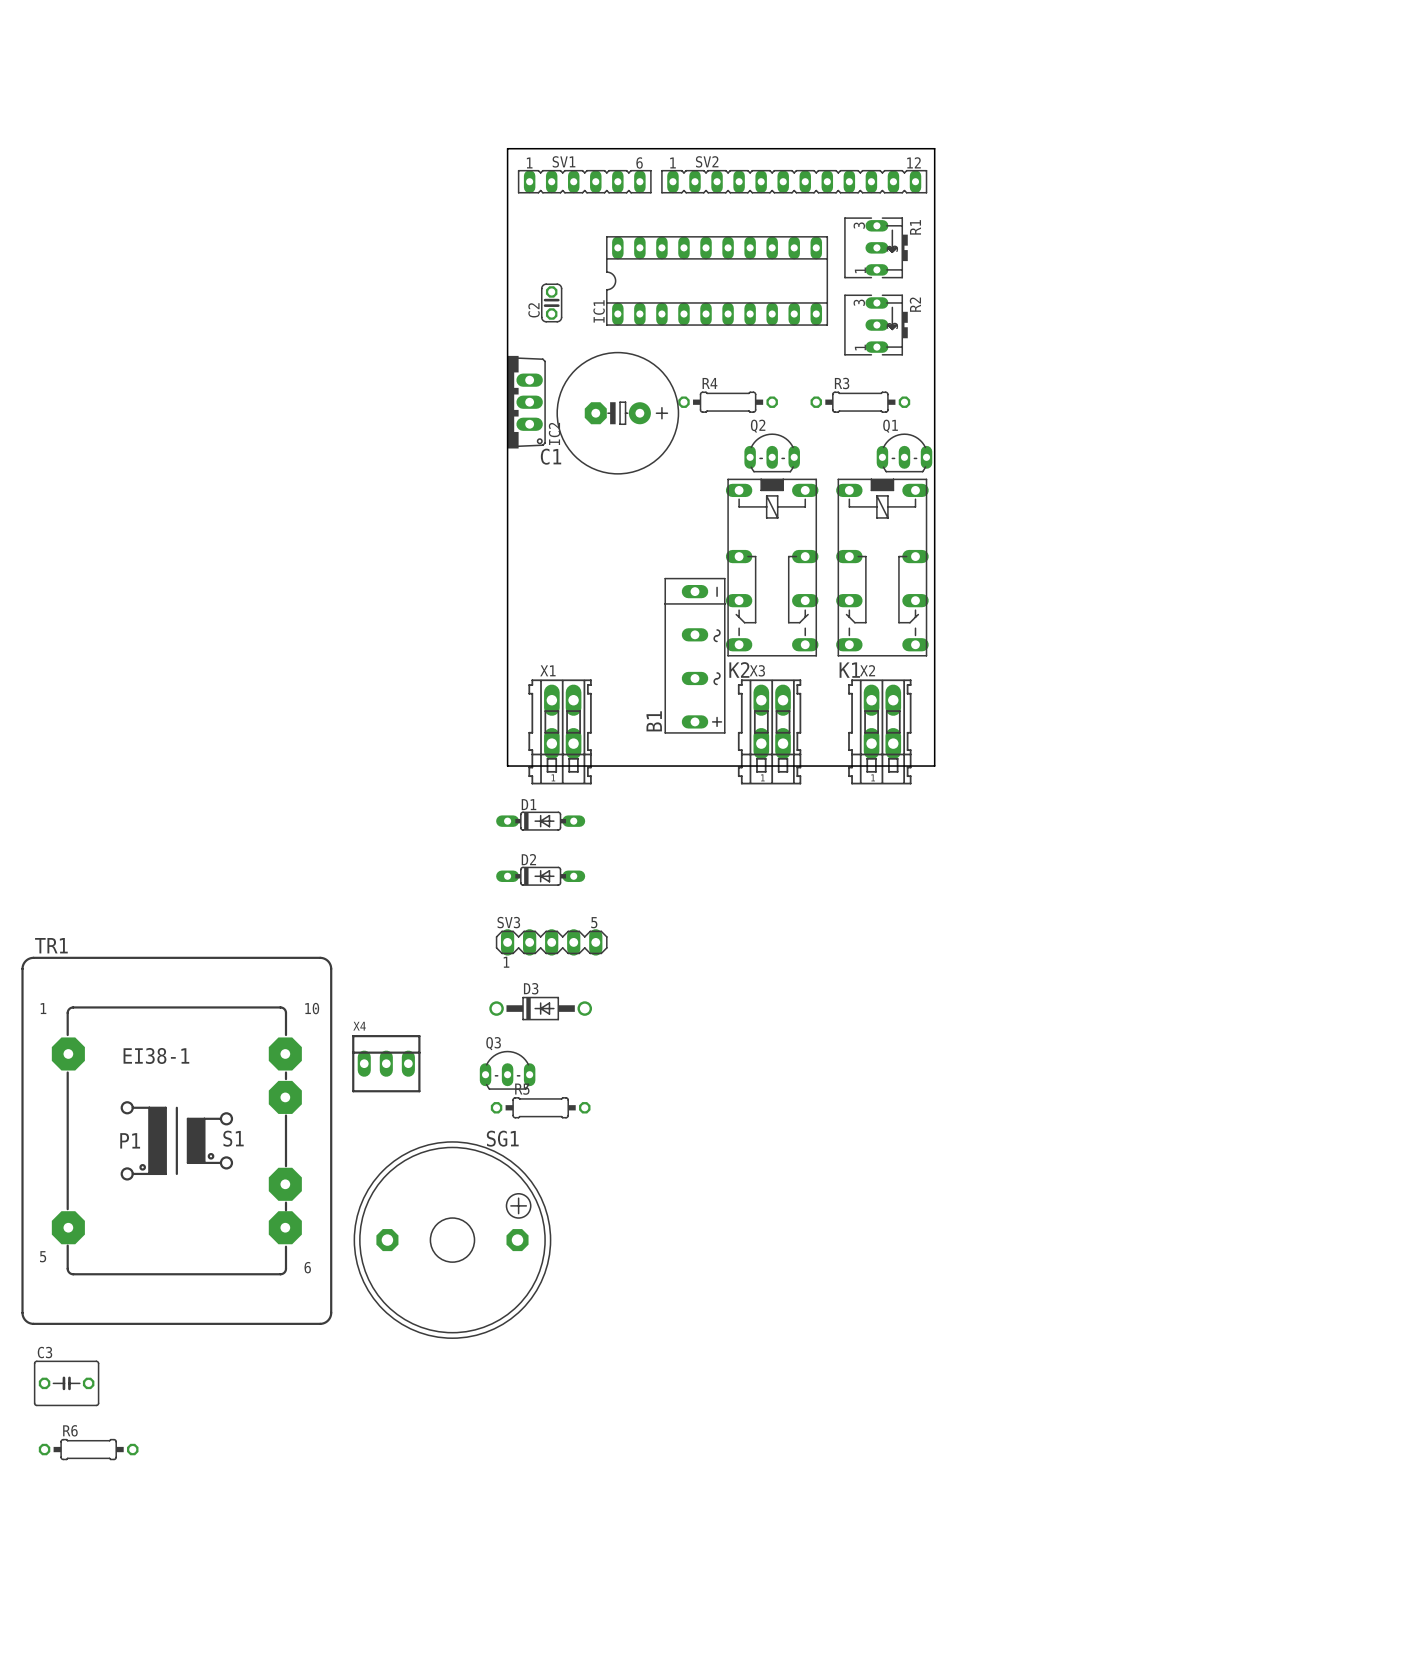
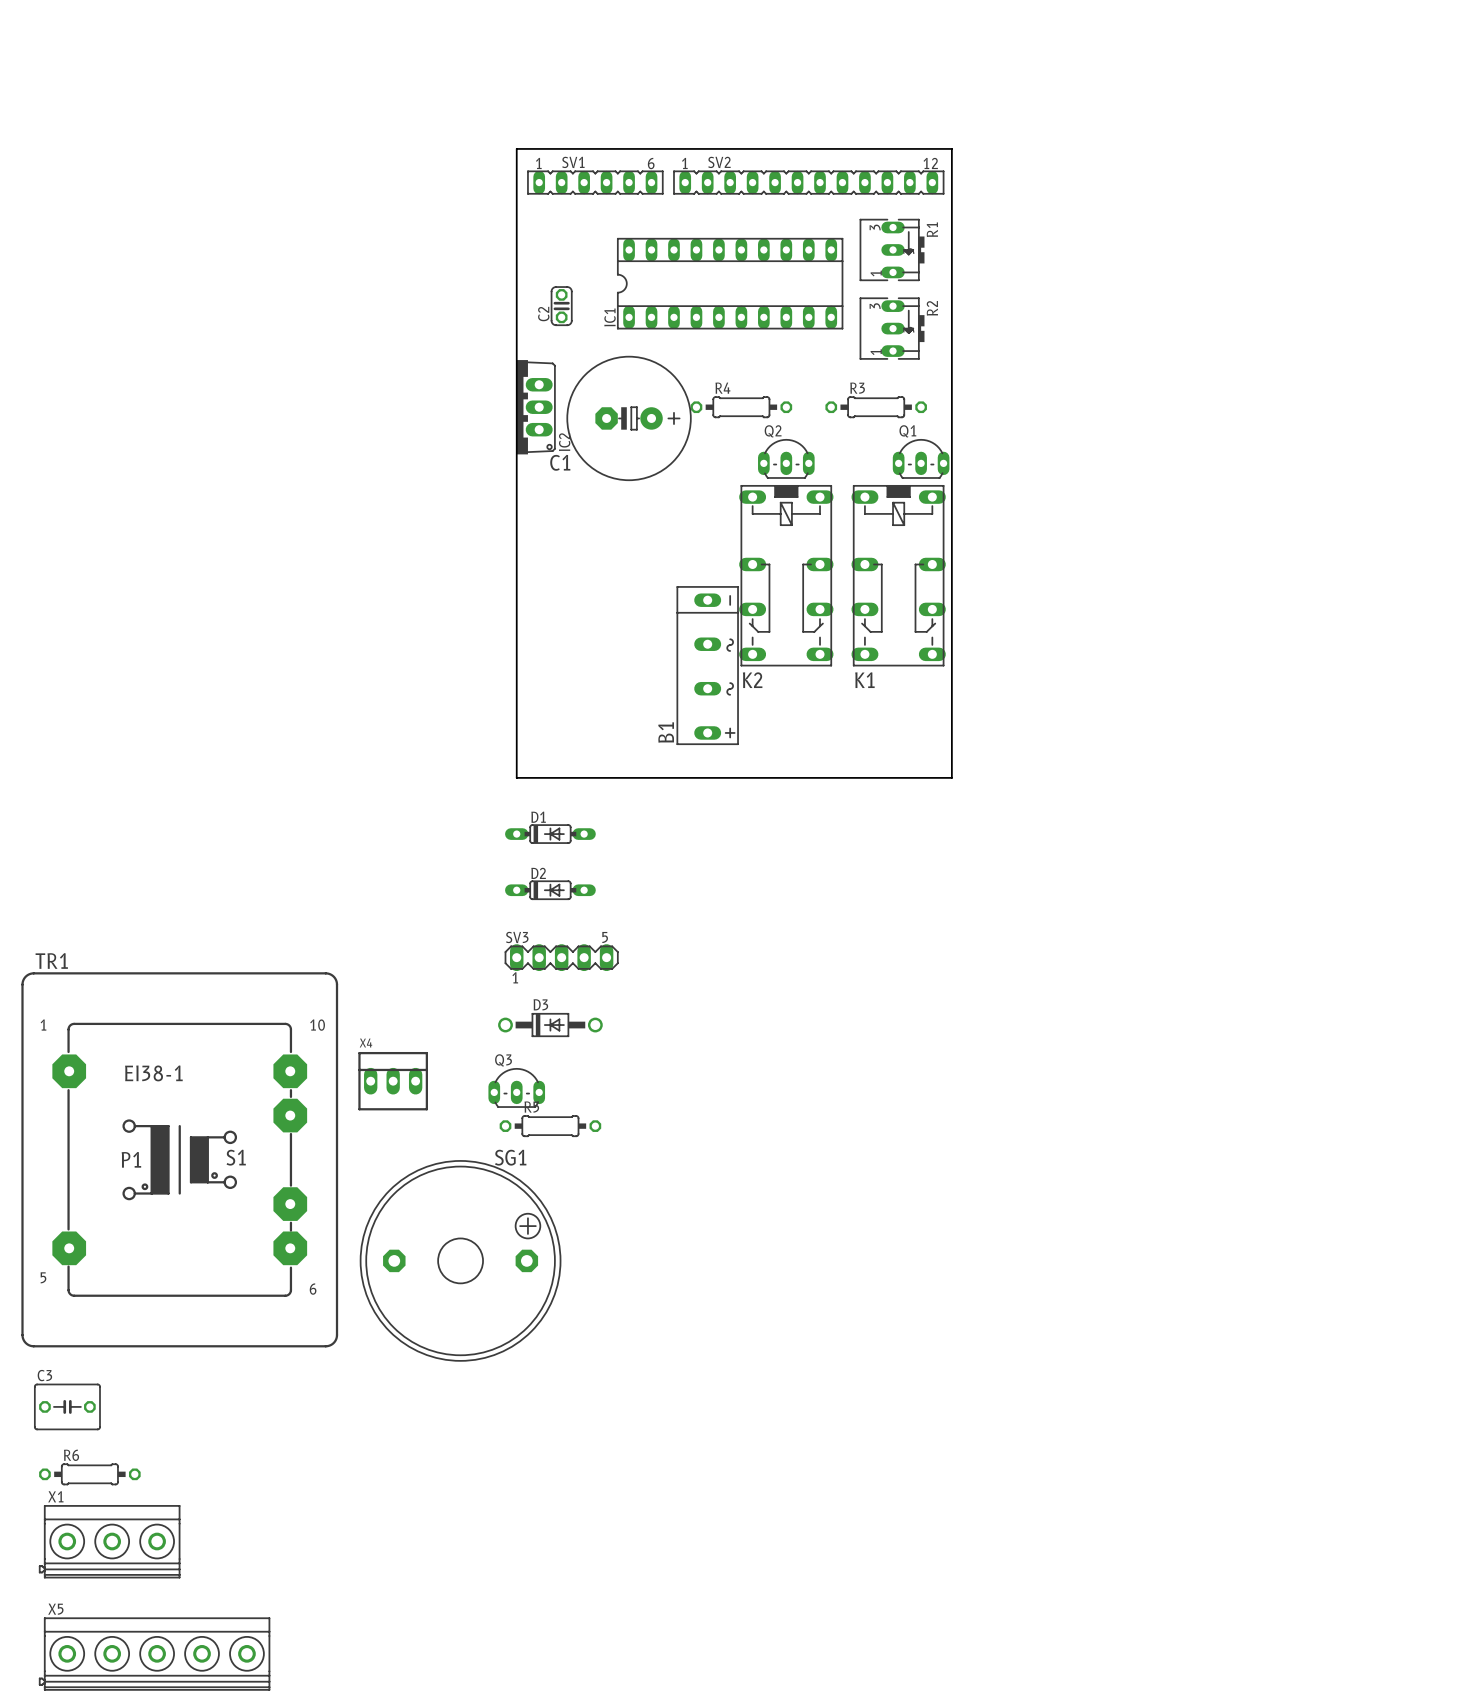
X1 name position: X1 (547, 670) -> X1 (55, 1496)
X1 footprint: [528, 679, 592, 785] -> [38, 1505, 181, 1579]
X3: (769, 731) -> none
X2: (879, 731) -> none
X5: none -> (154, 1654)

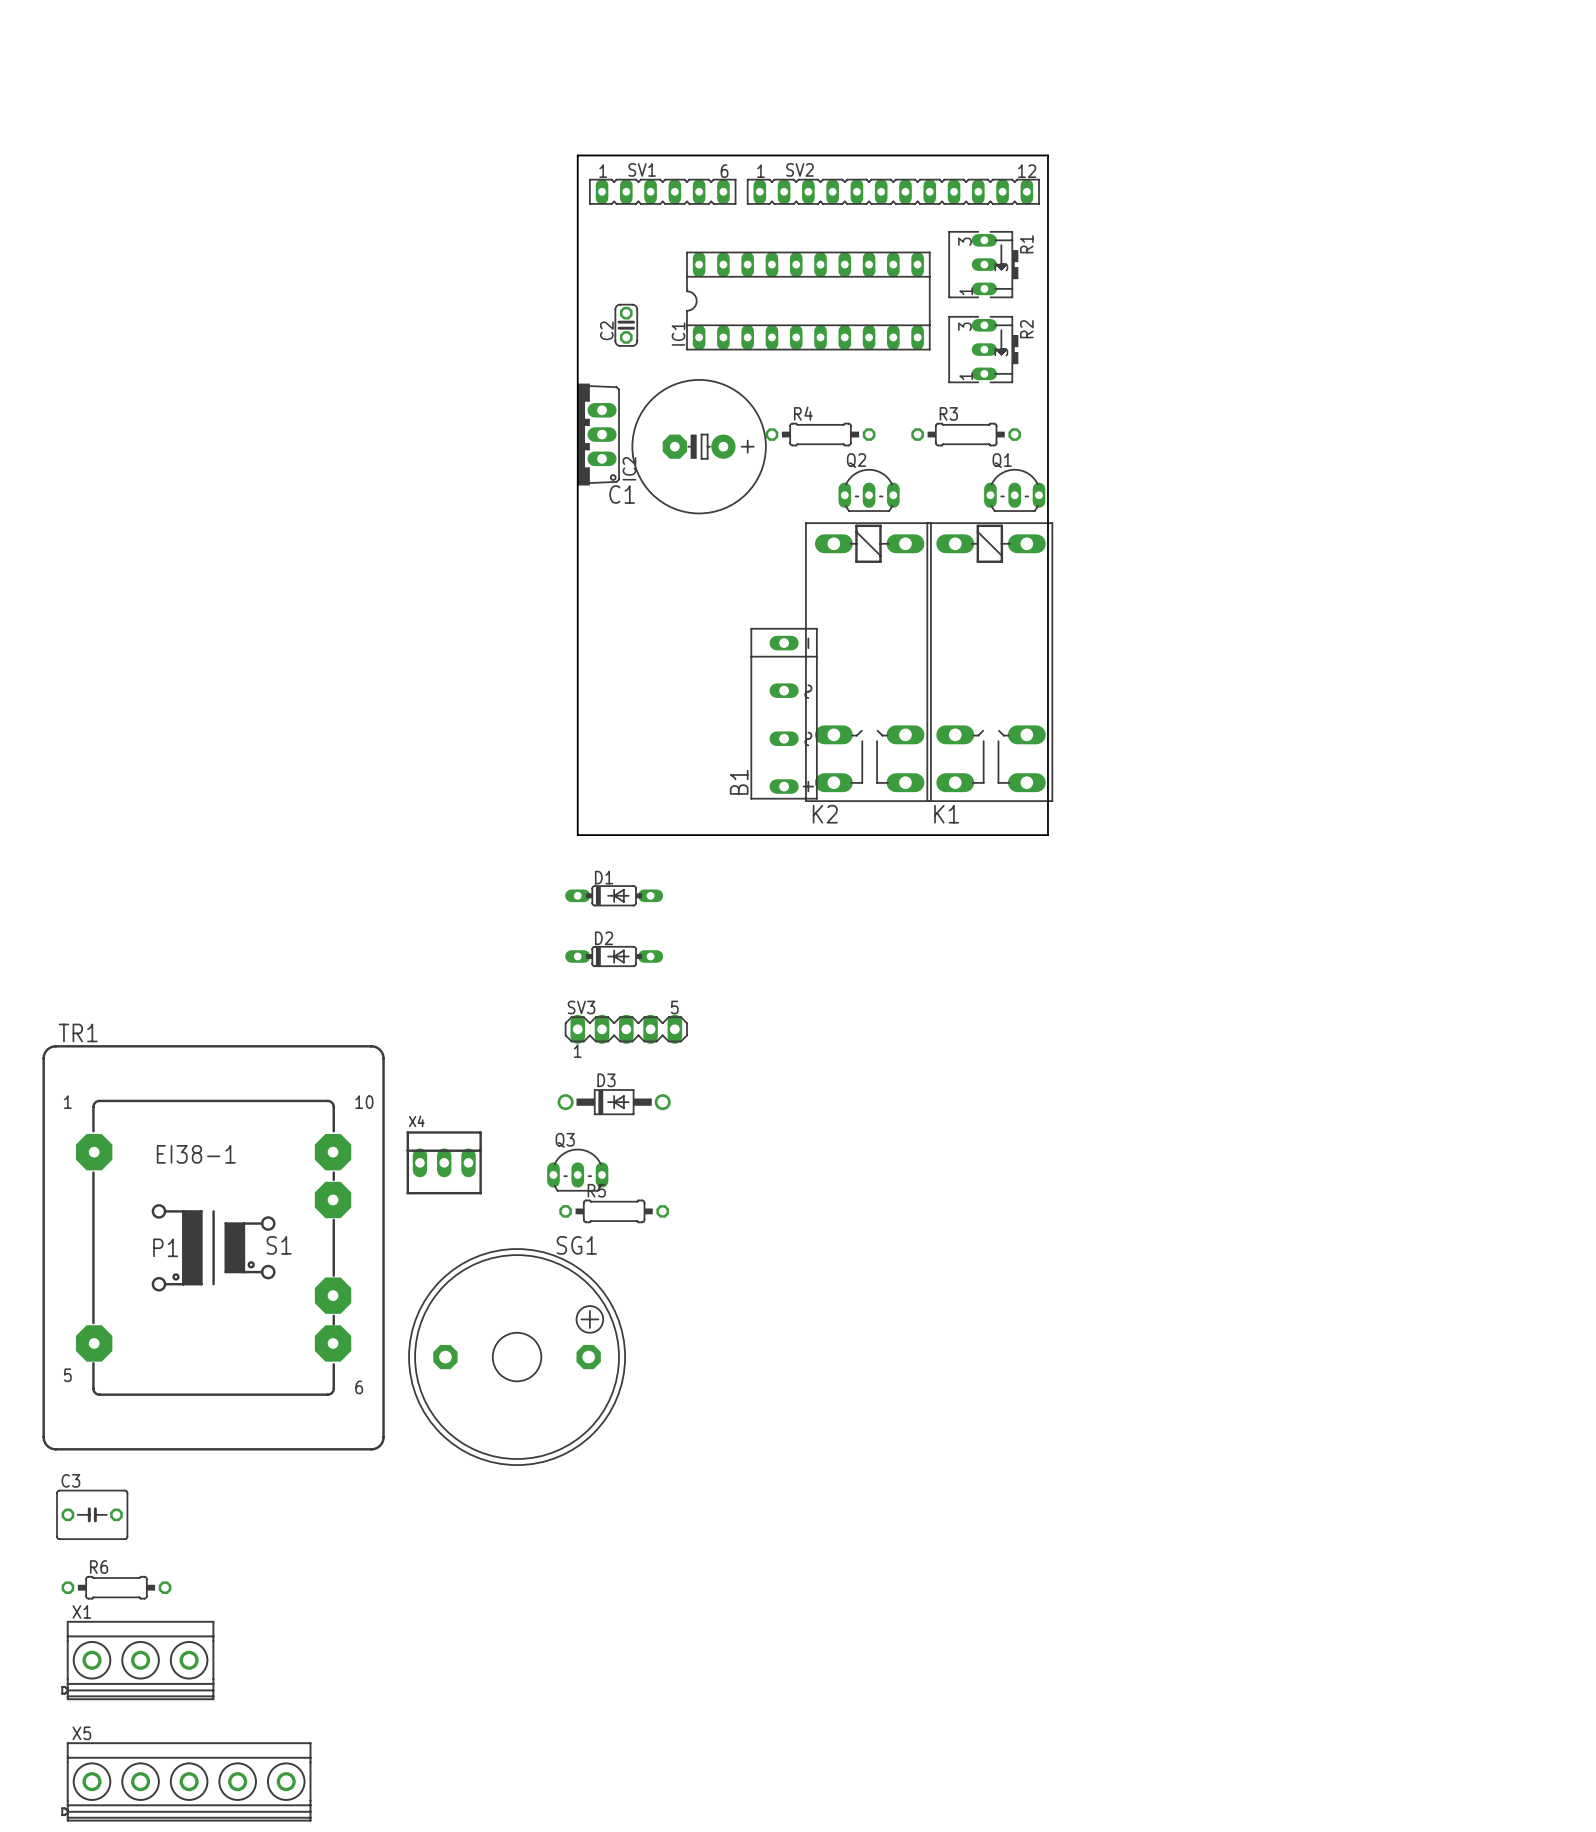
K2 footprint: [739, 485, 834, 667] -> [805, 522, 932, 802]
K1 footprint: [851, 485, 946, 667] -> [926, 522, 1054, 802]
K2 name position: K2 (752, 680) -> K2 (825, 814)
K1 name position: K1 (864, 680) -> K1 (946, 814)

